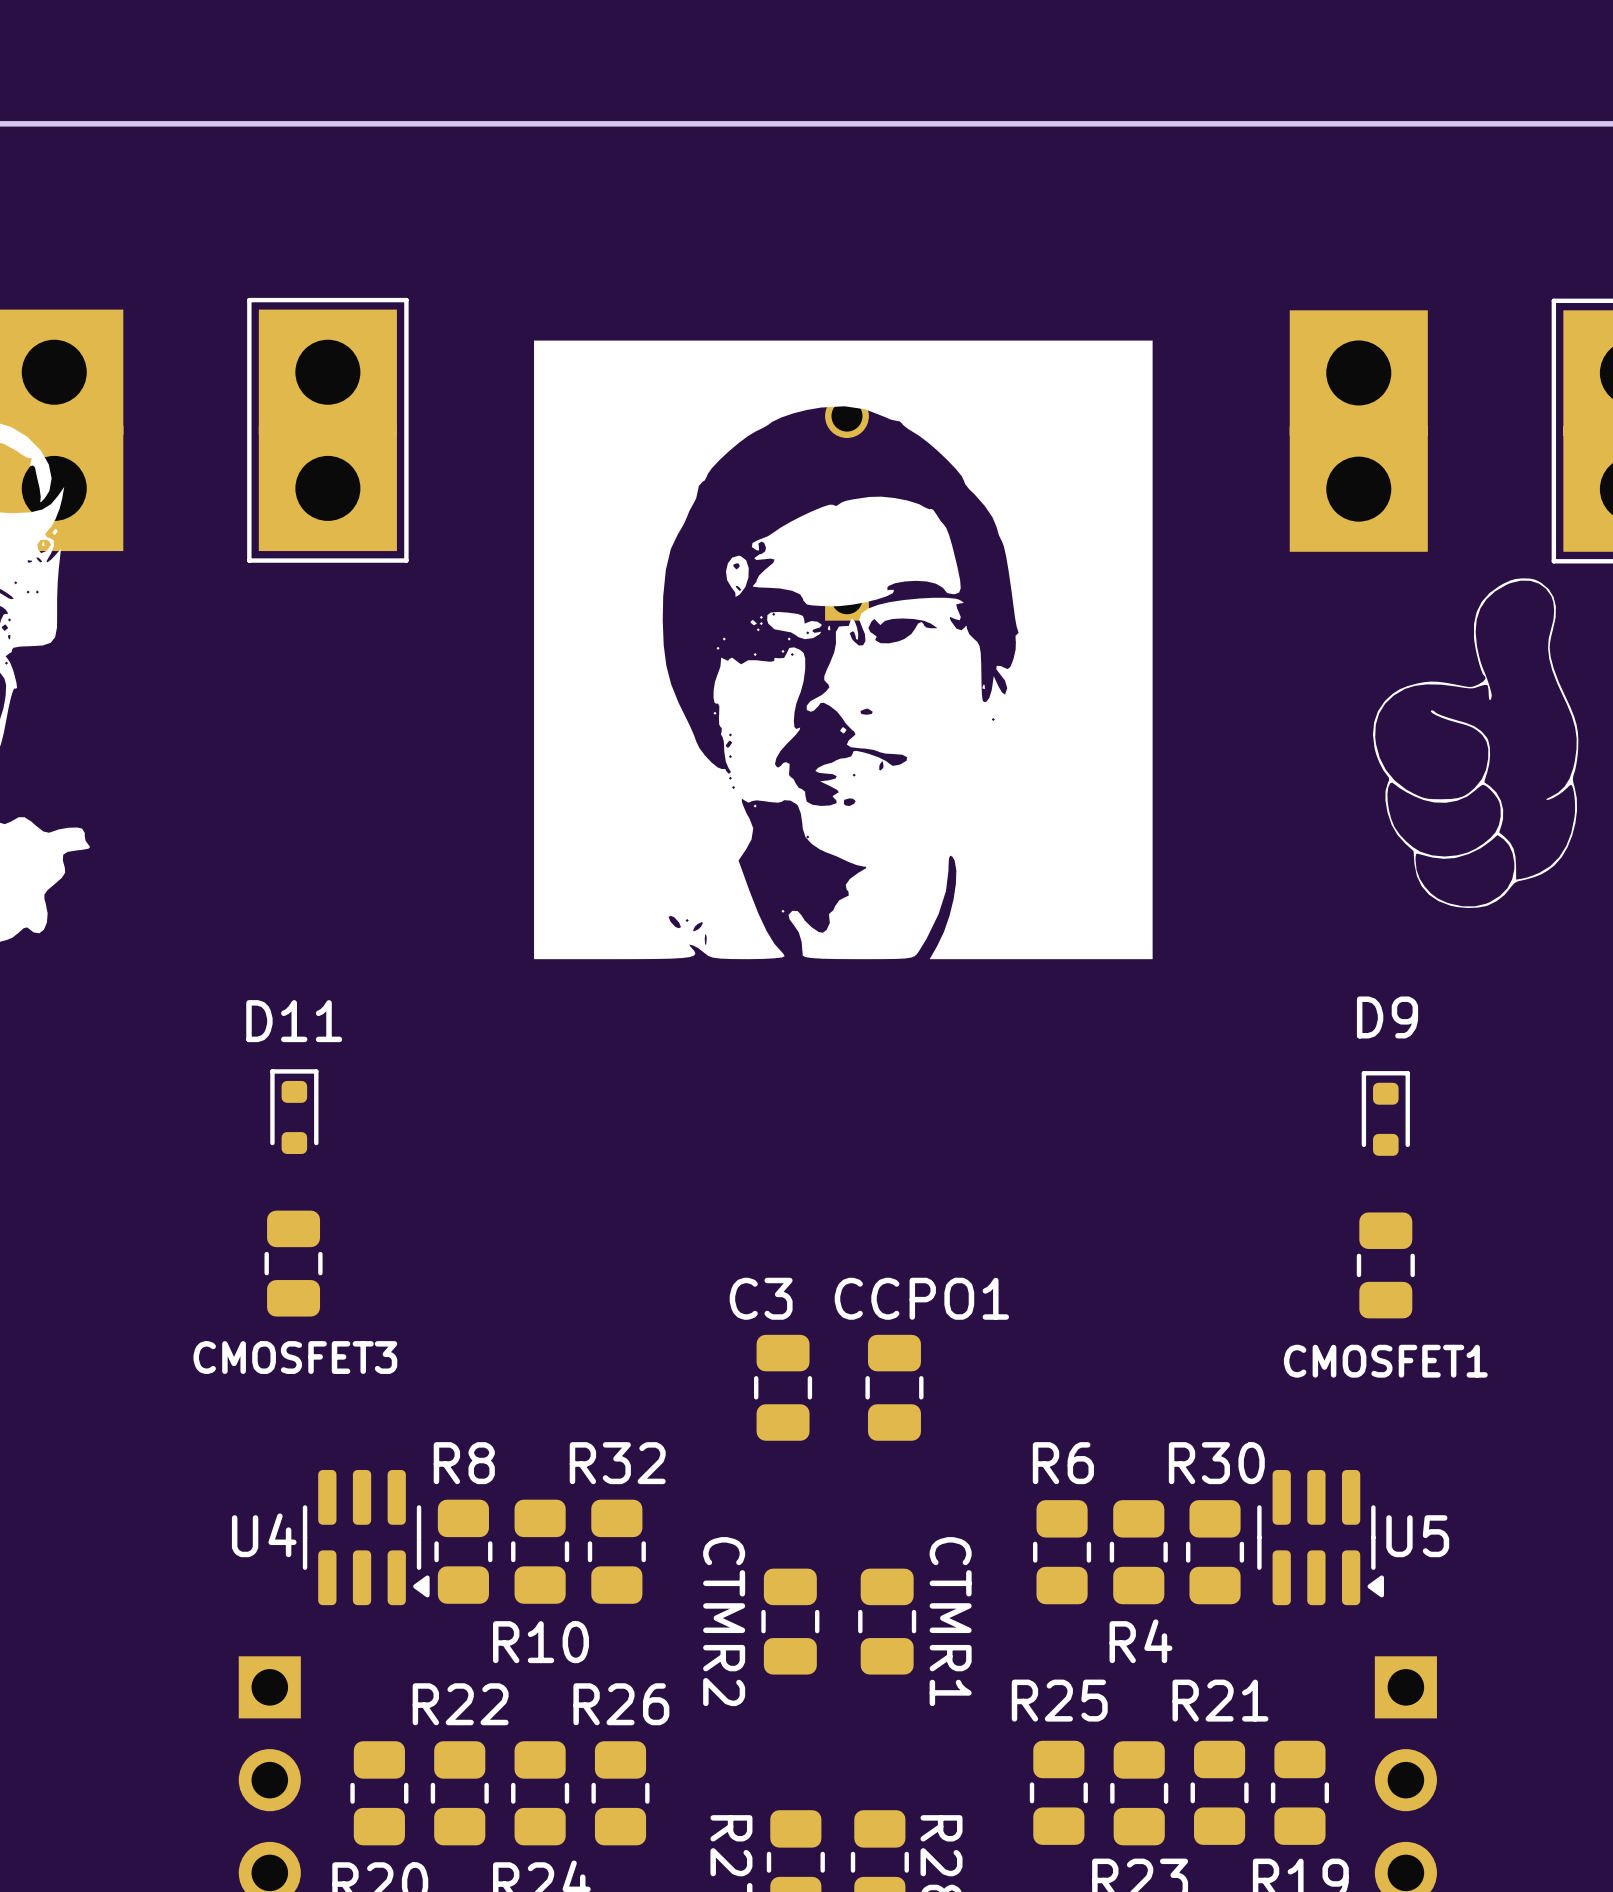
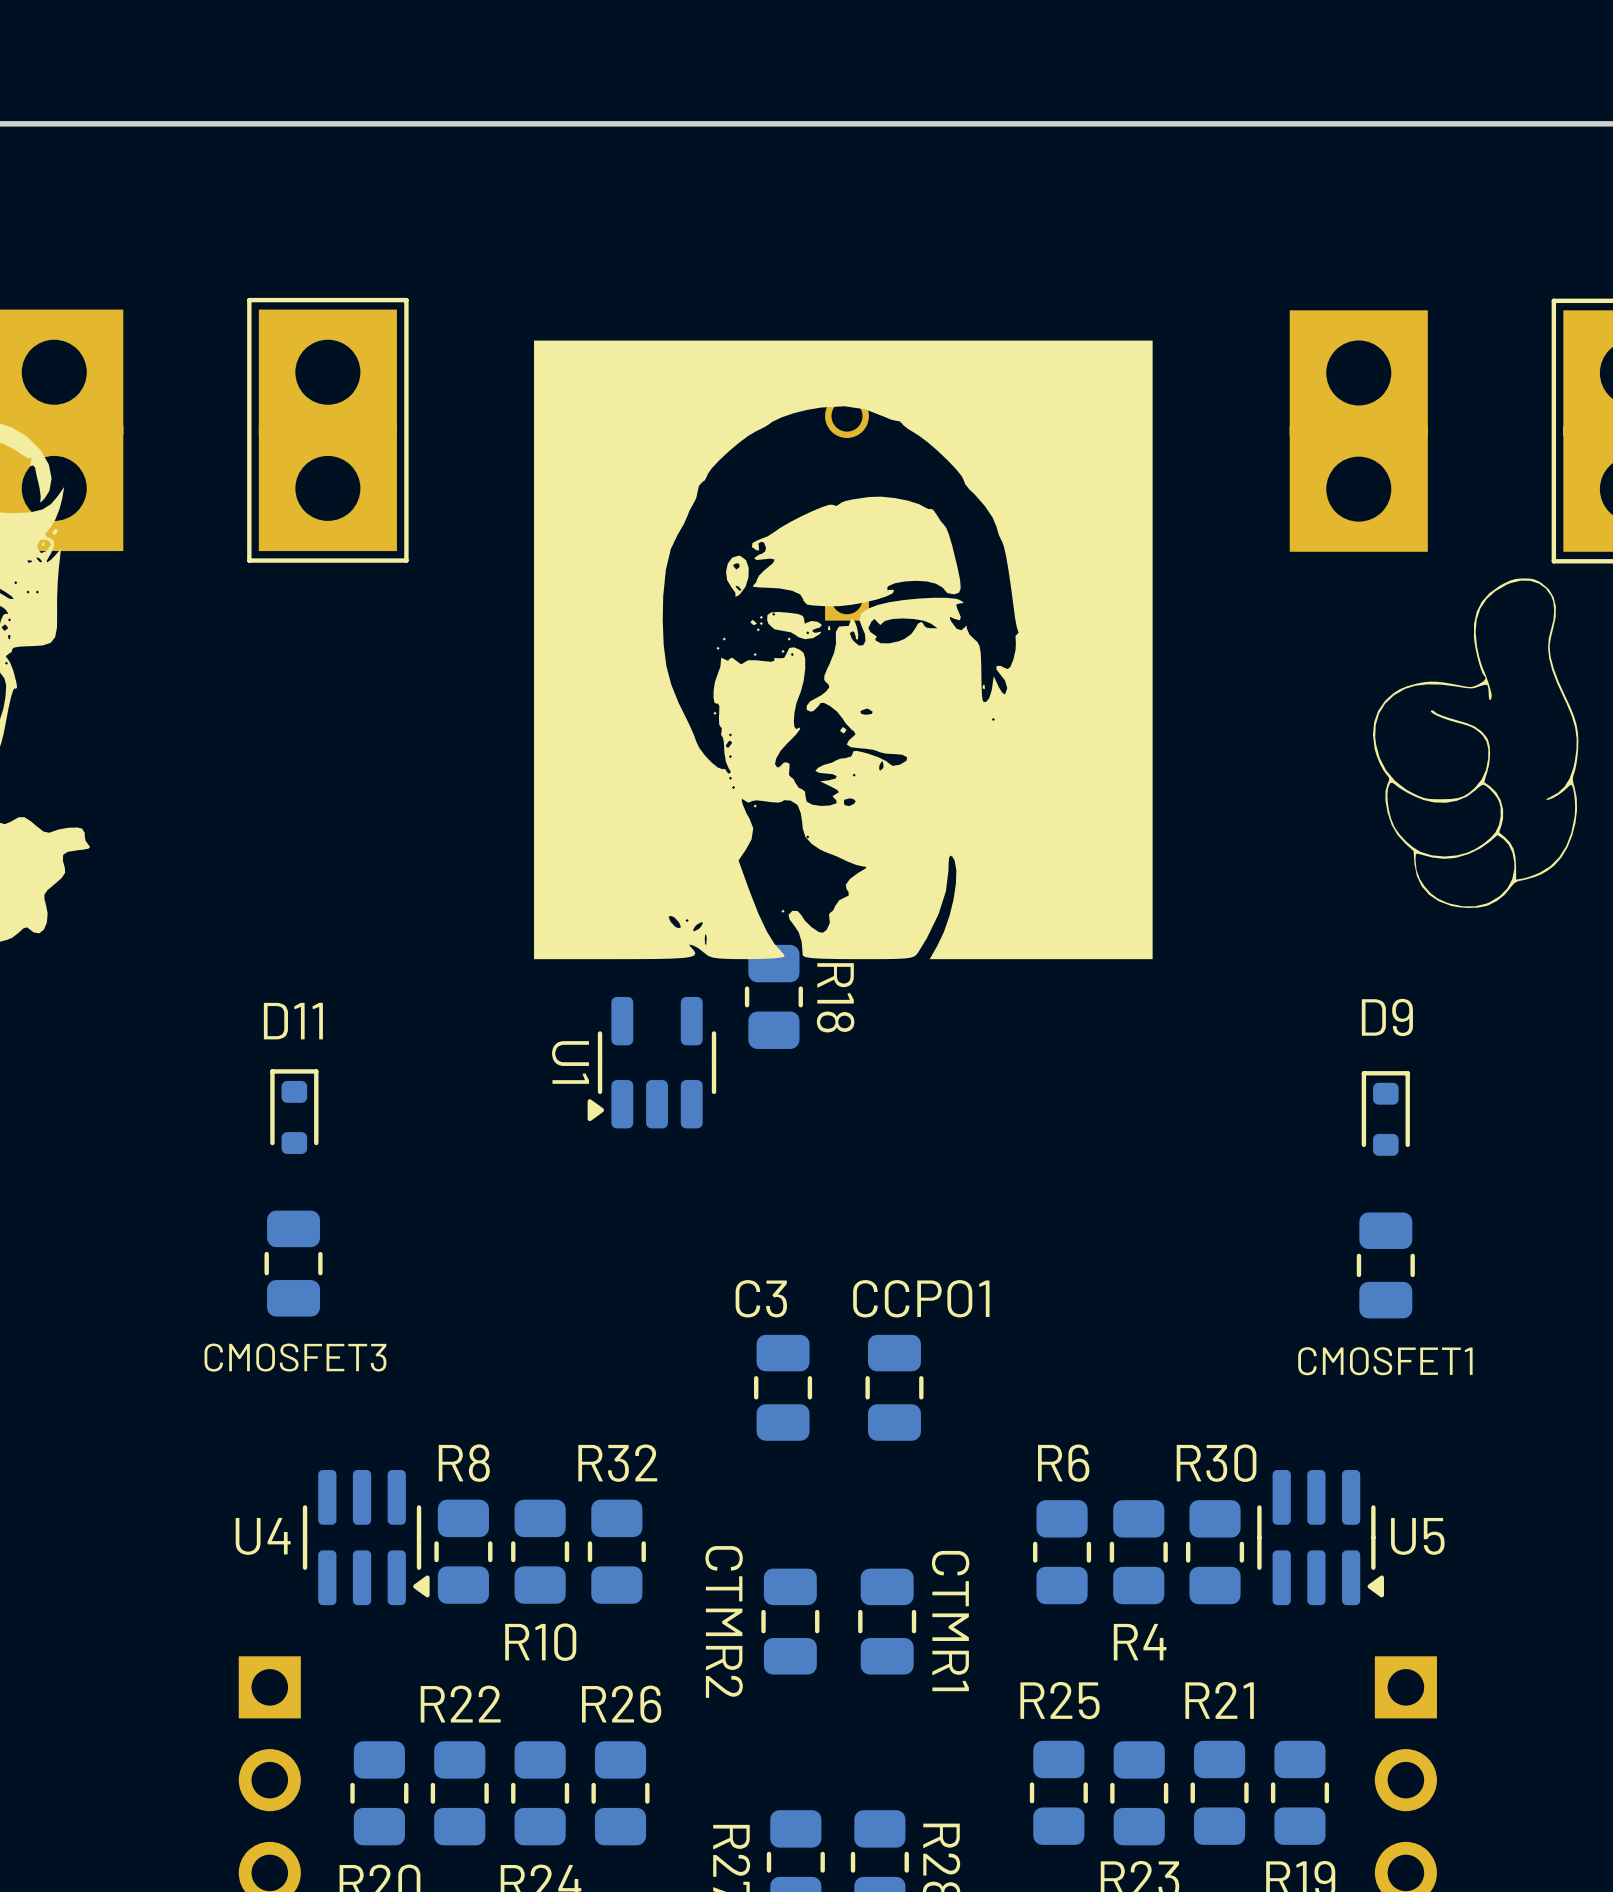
R18: none -> (773, 996)
U1: none -> (651, 1062)

